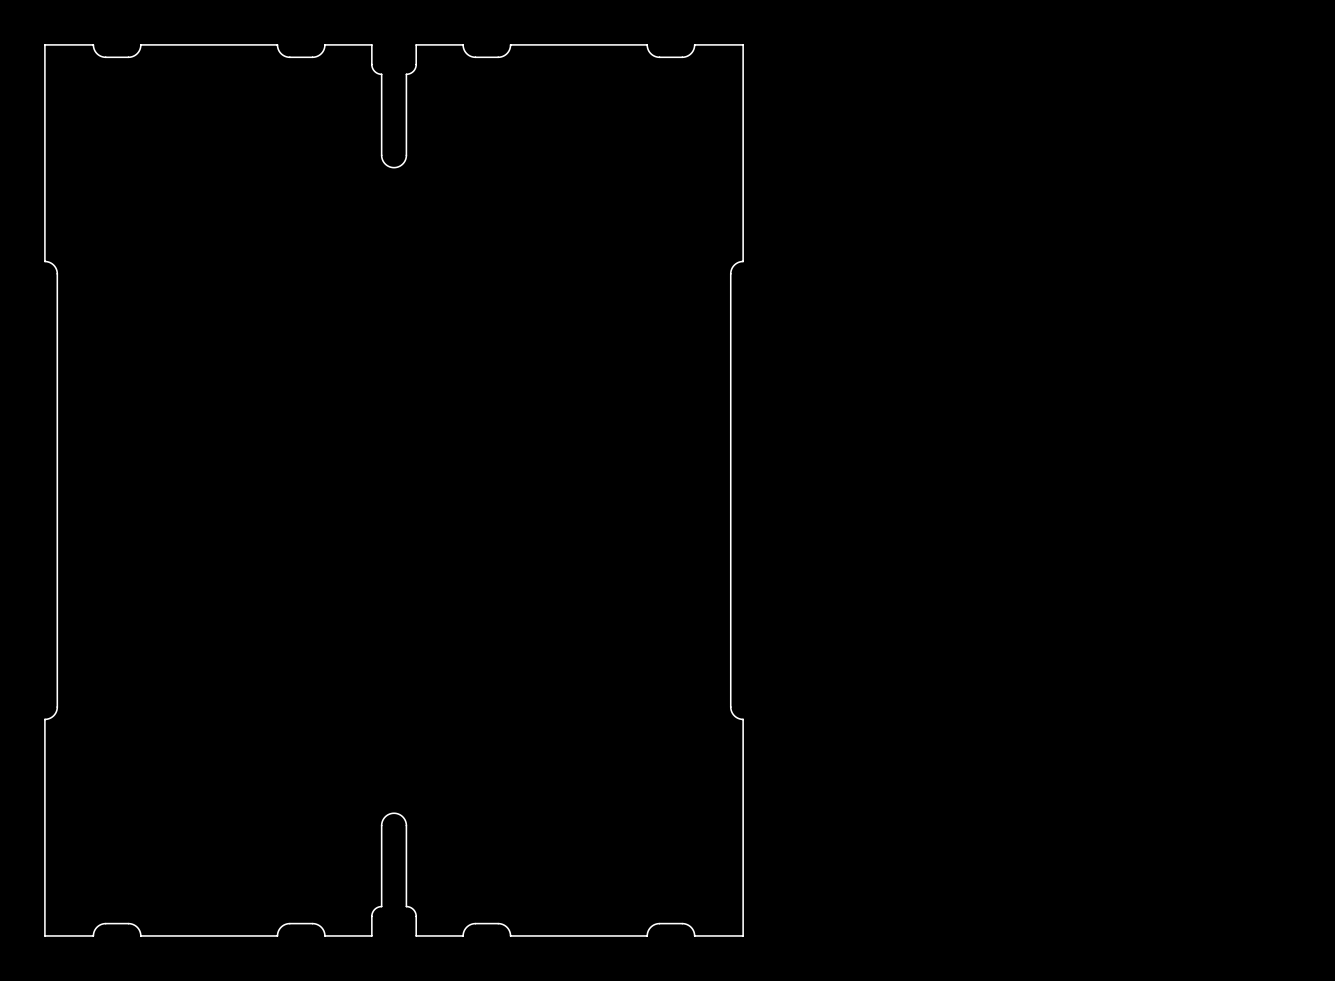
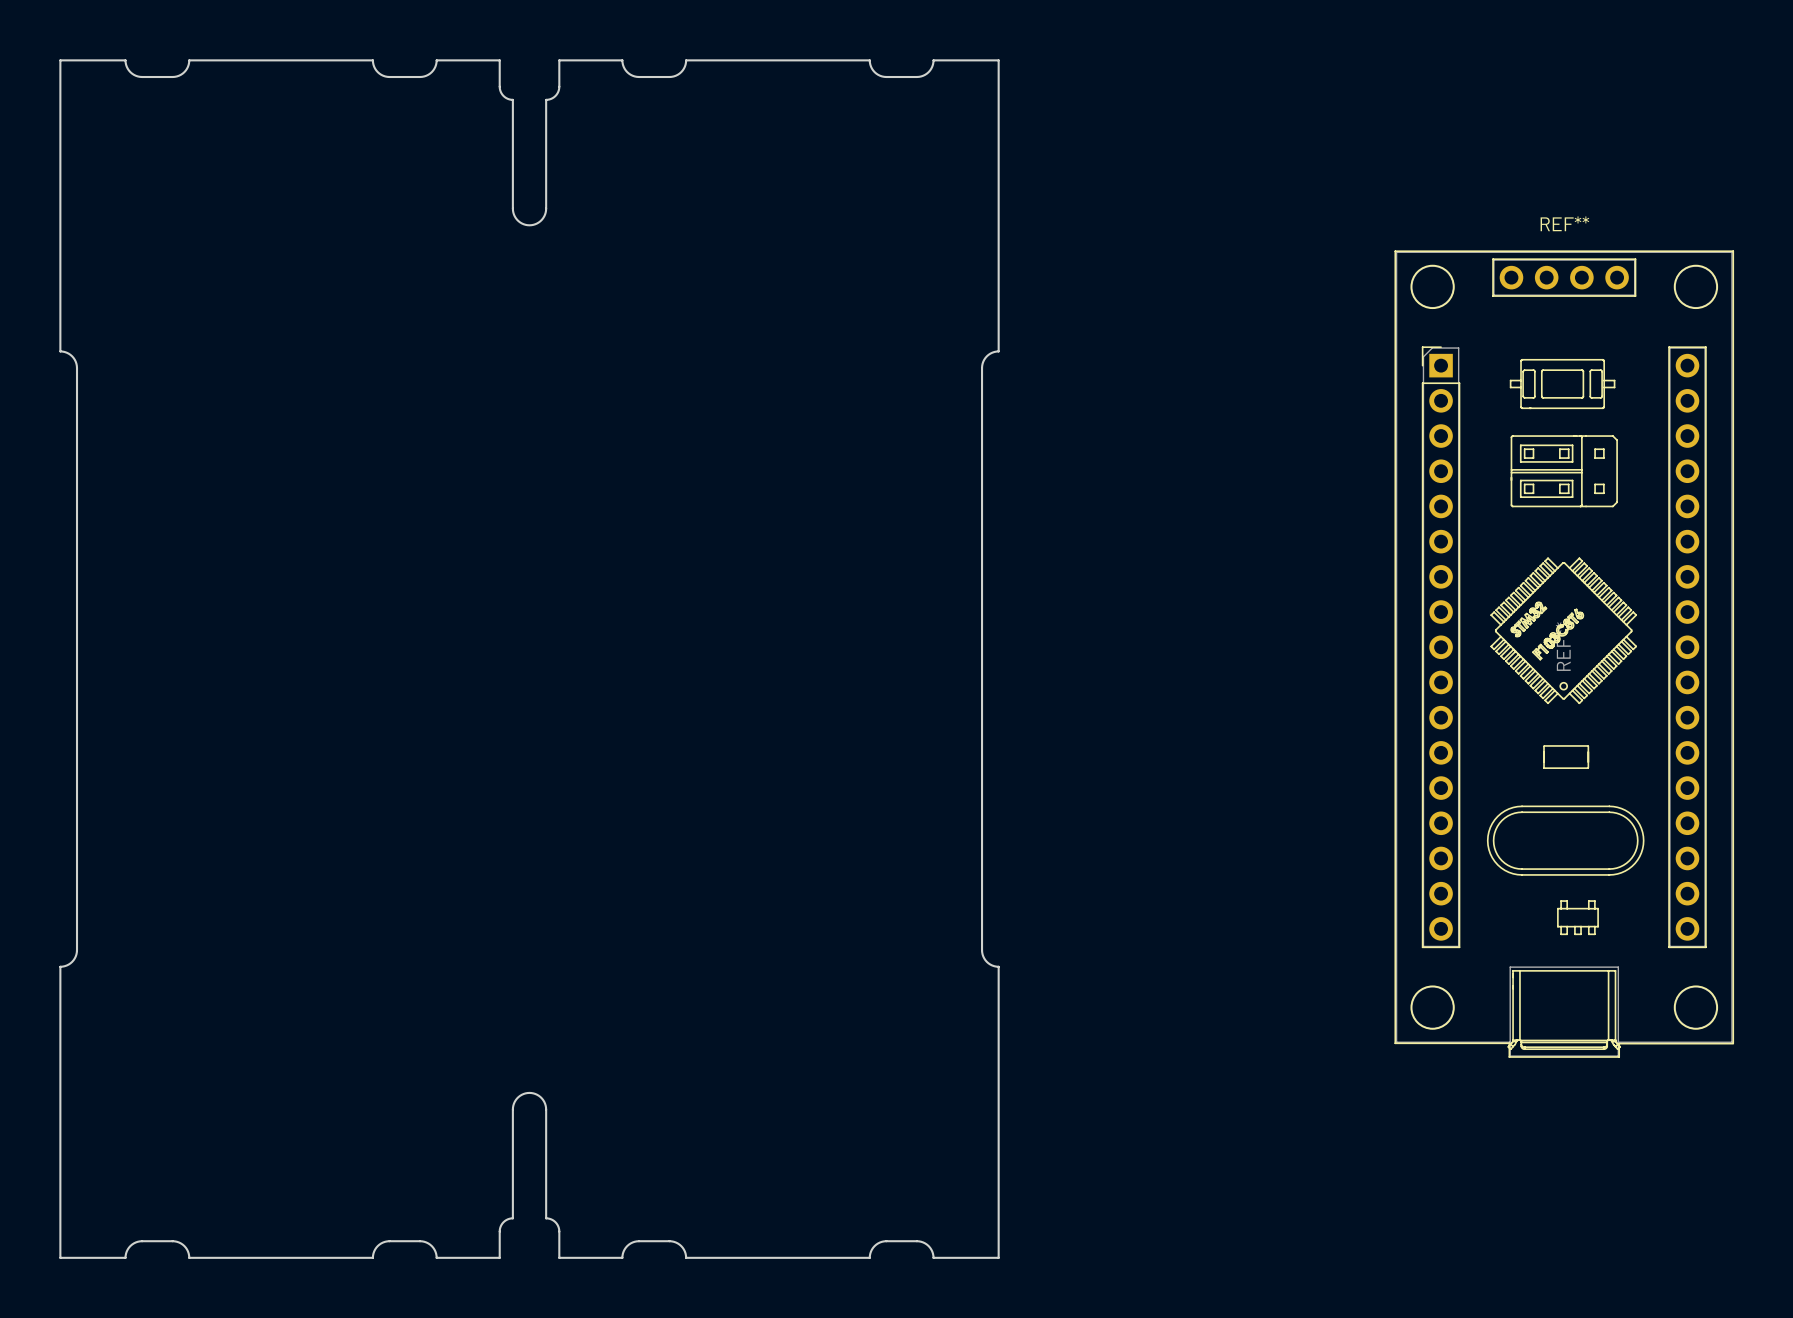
REF**: none -> (1564, 654)

